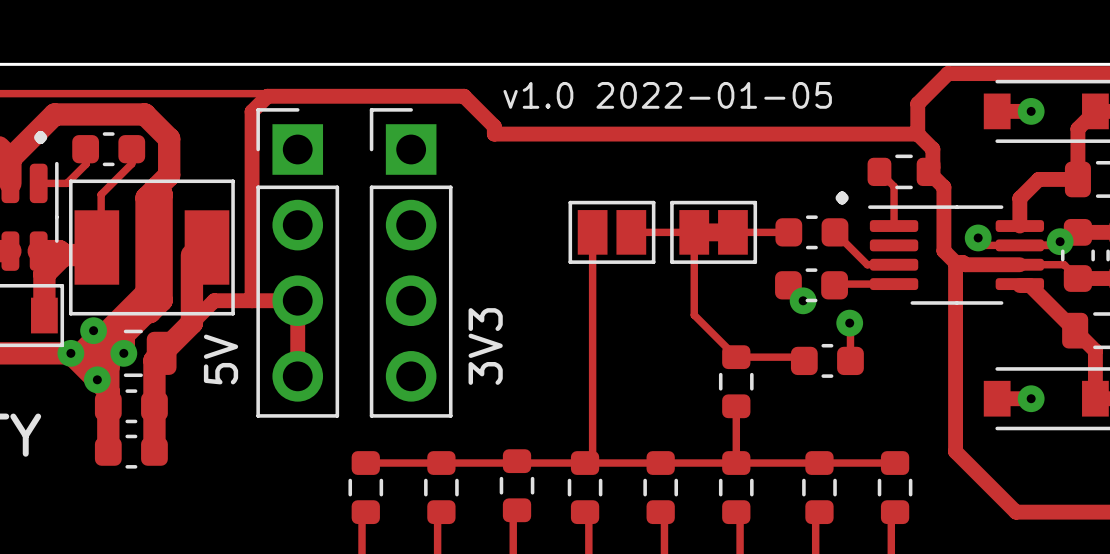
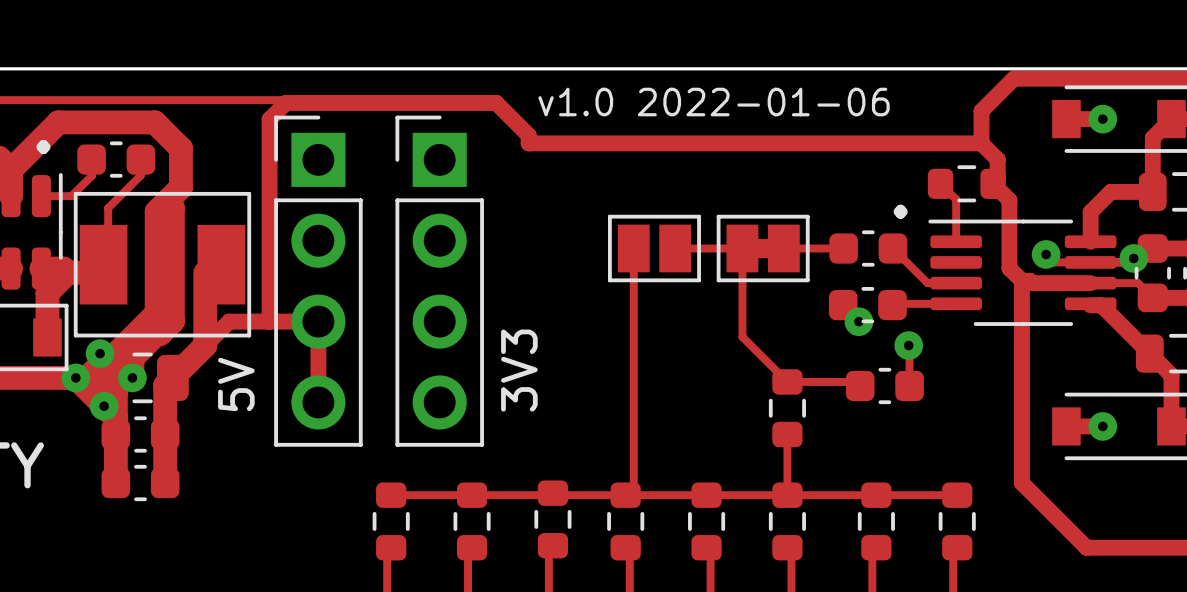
text: v1.0 2022-01-05 (667, 95) -> v1.0 2022-01-06 (714, 102)

